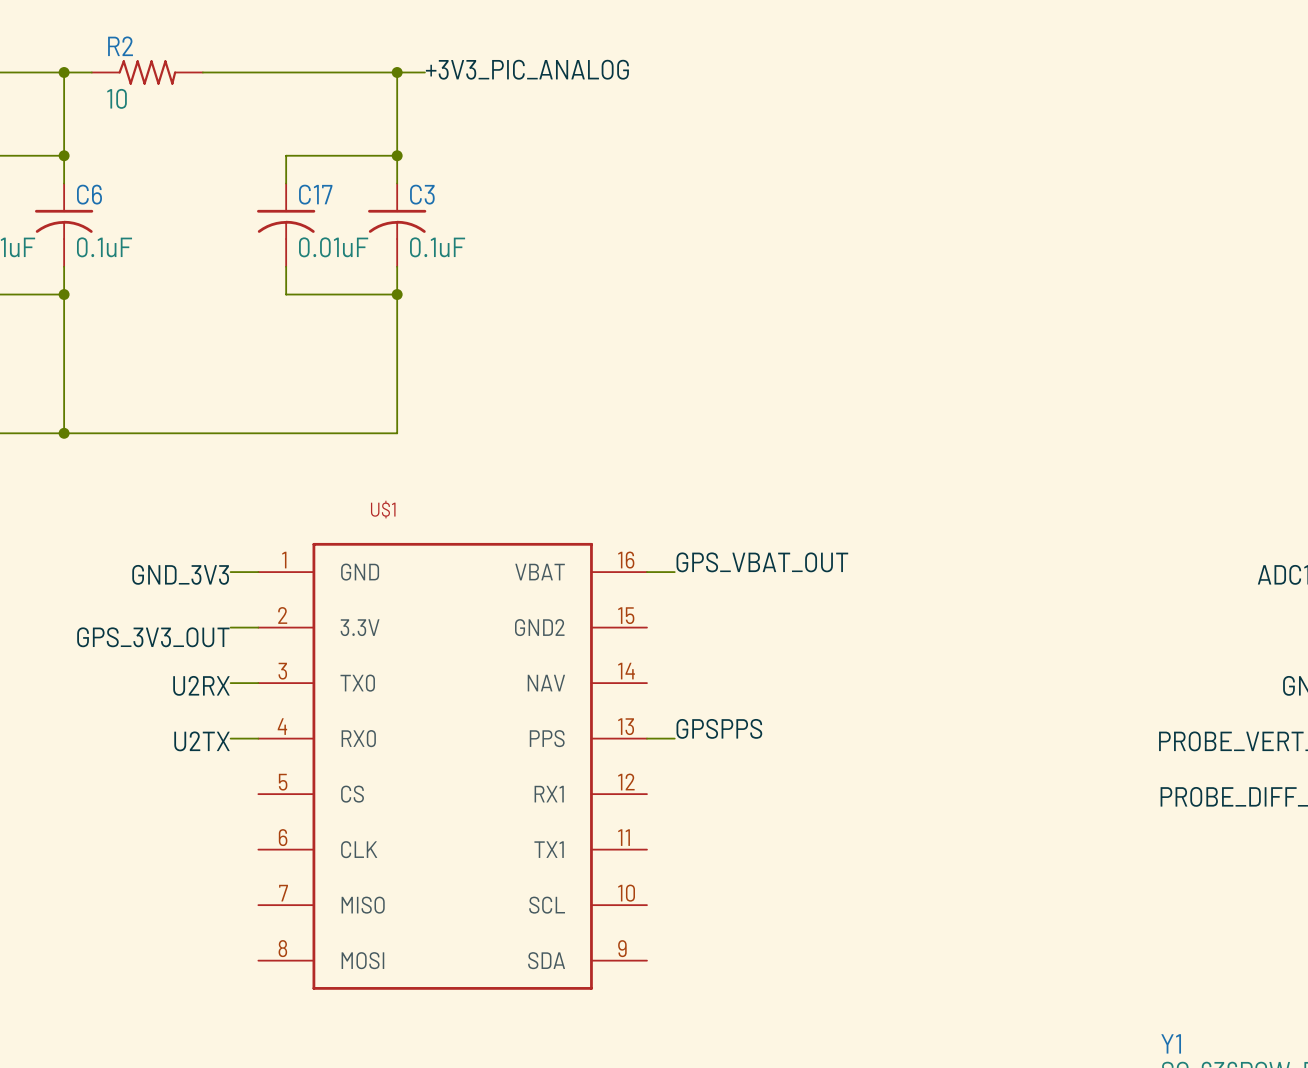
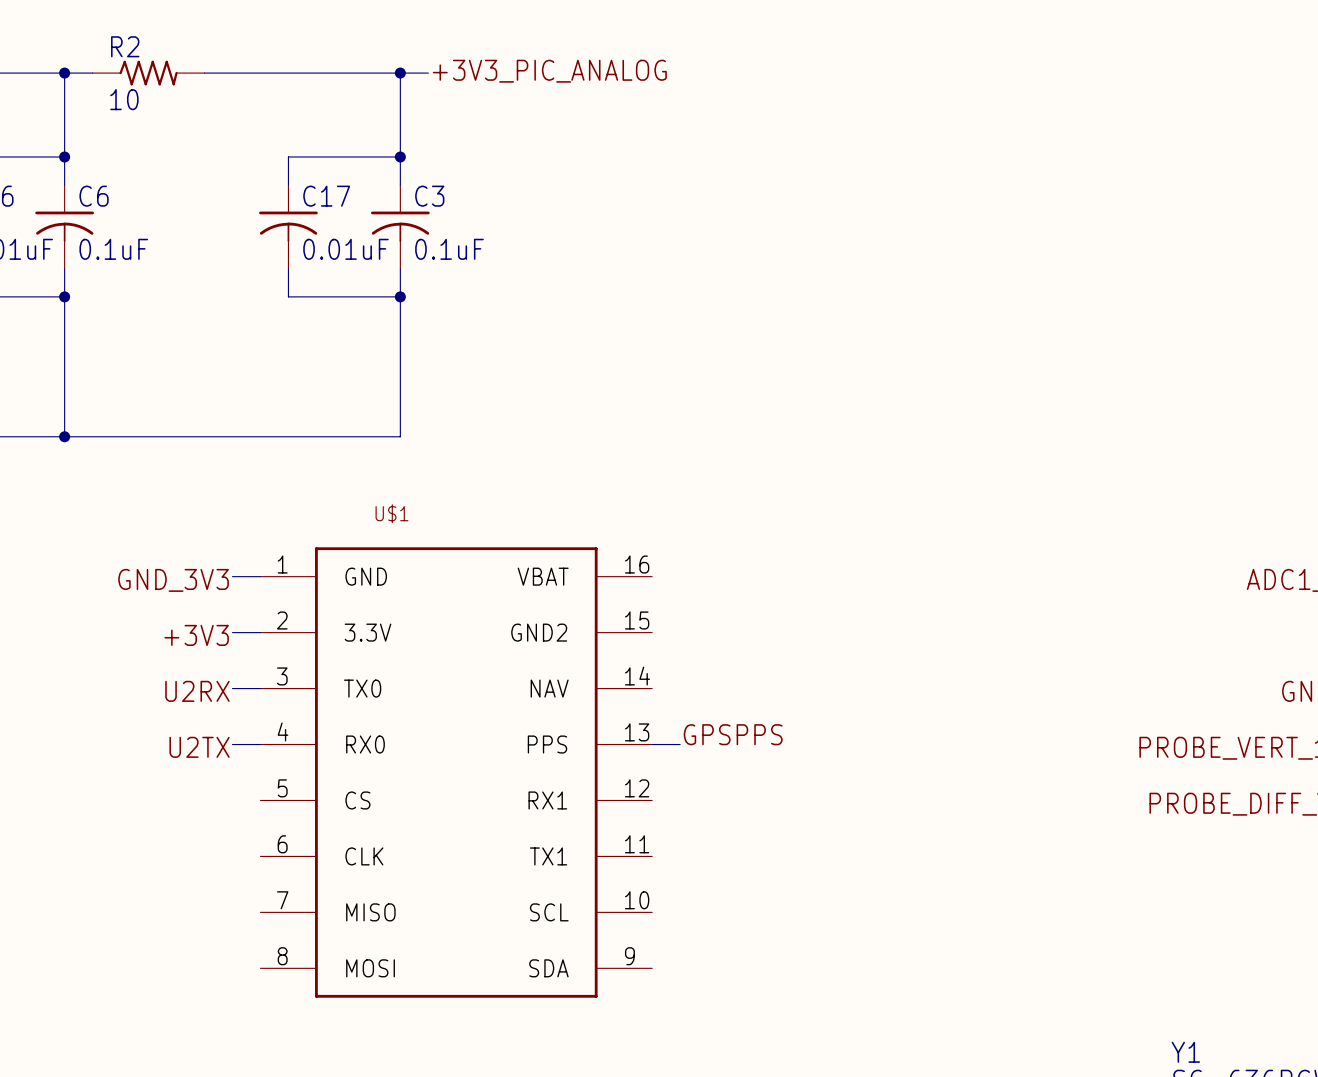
label: GPS_VBAT_OUT (762, 562) -> none
wire: (646, 572) (674, 572) -> none
label: GPS_3V3_OUT (153, 637) -> +3V3 (196, 635)

